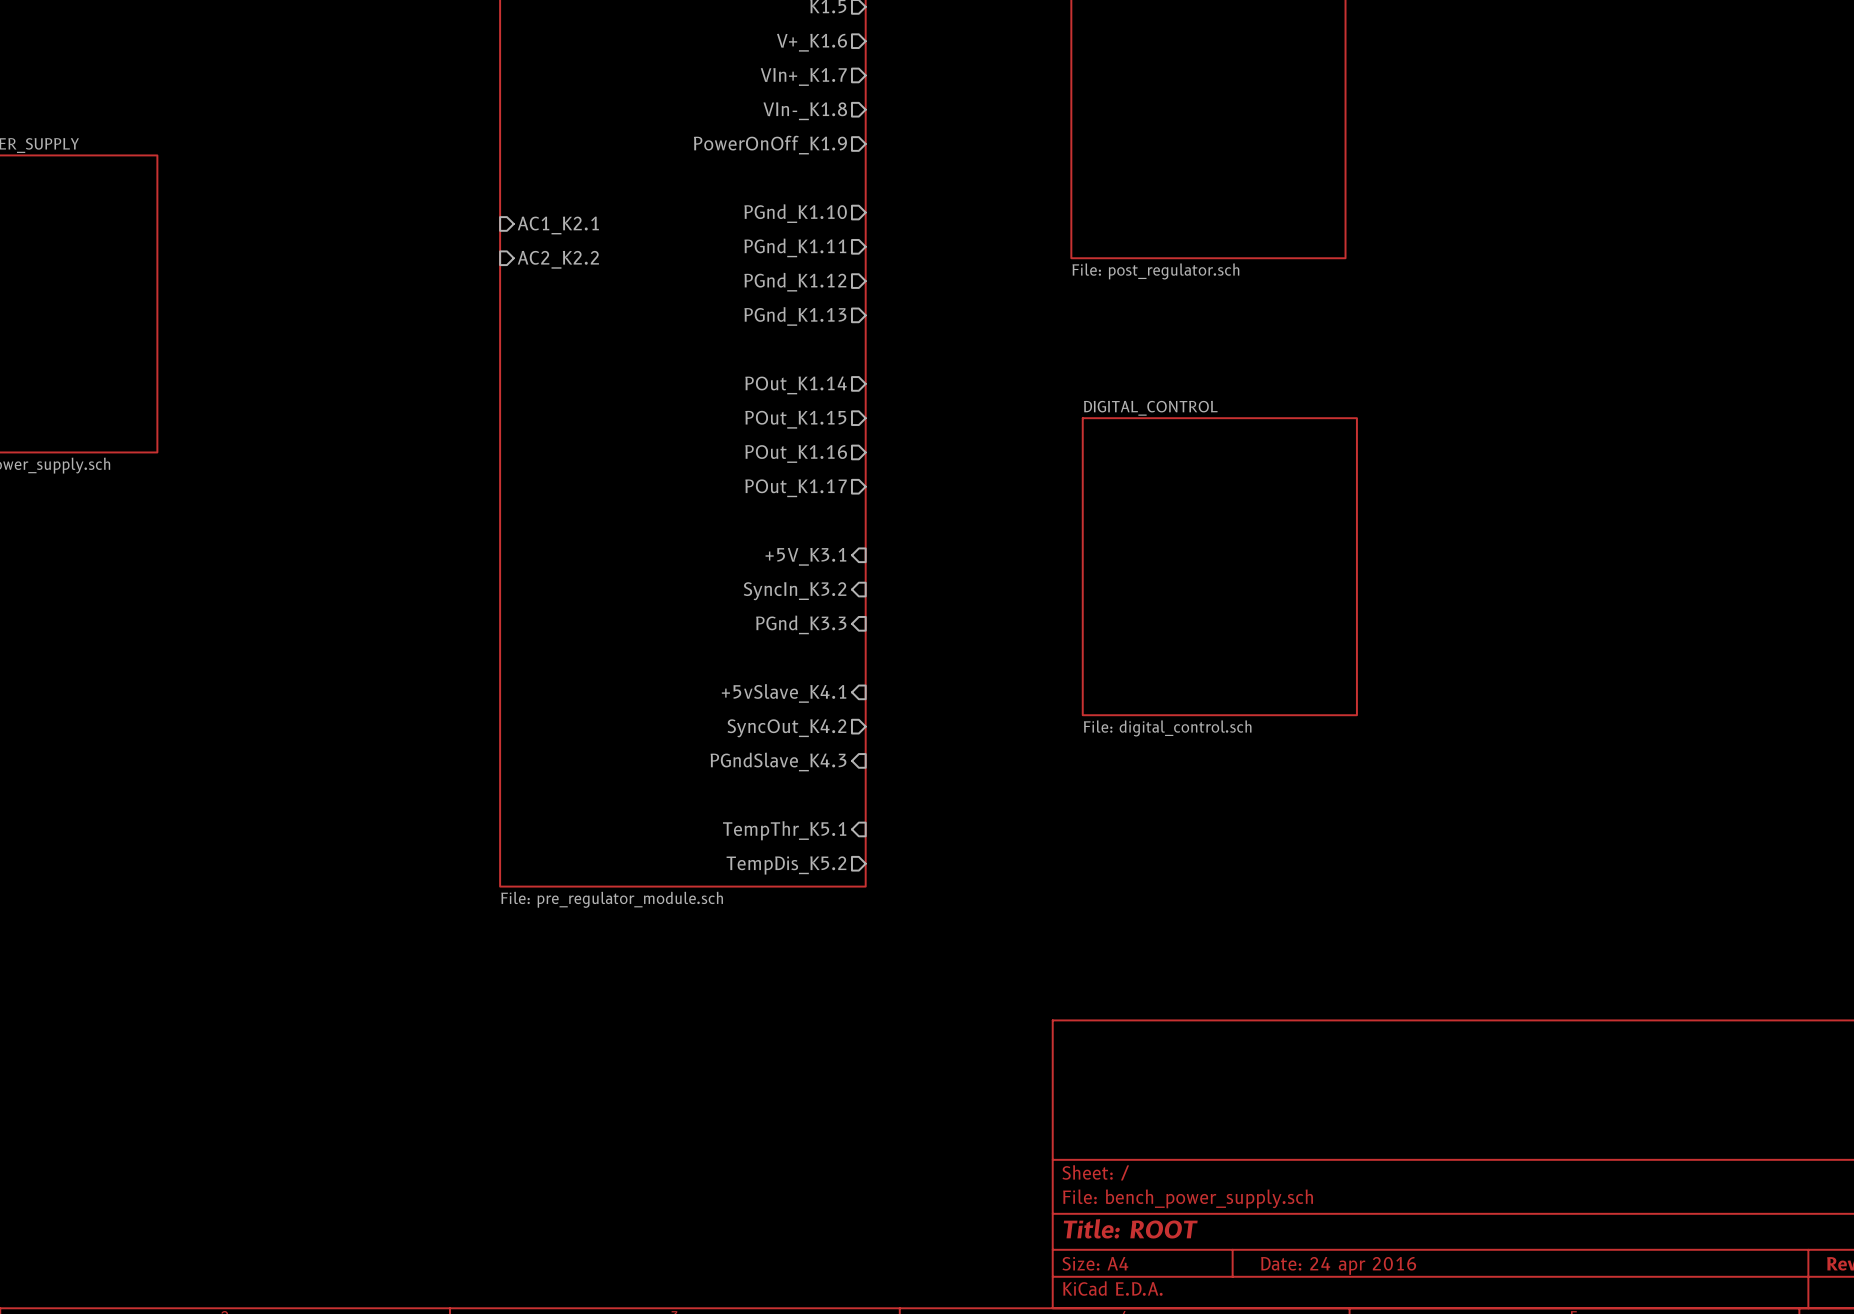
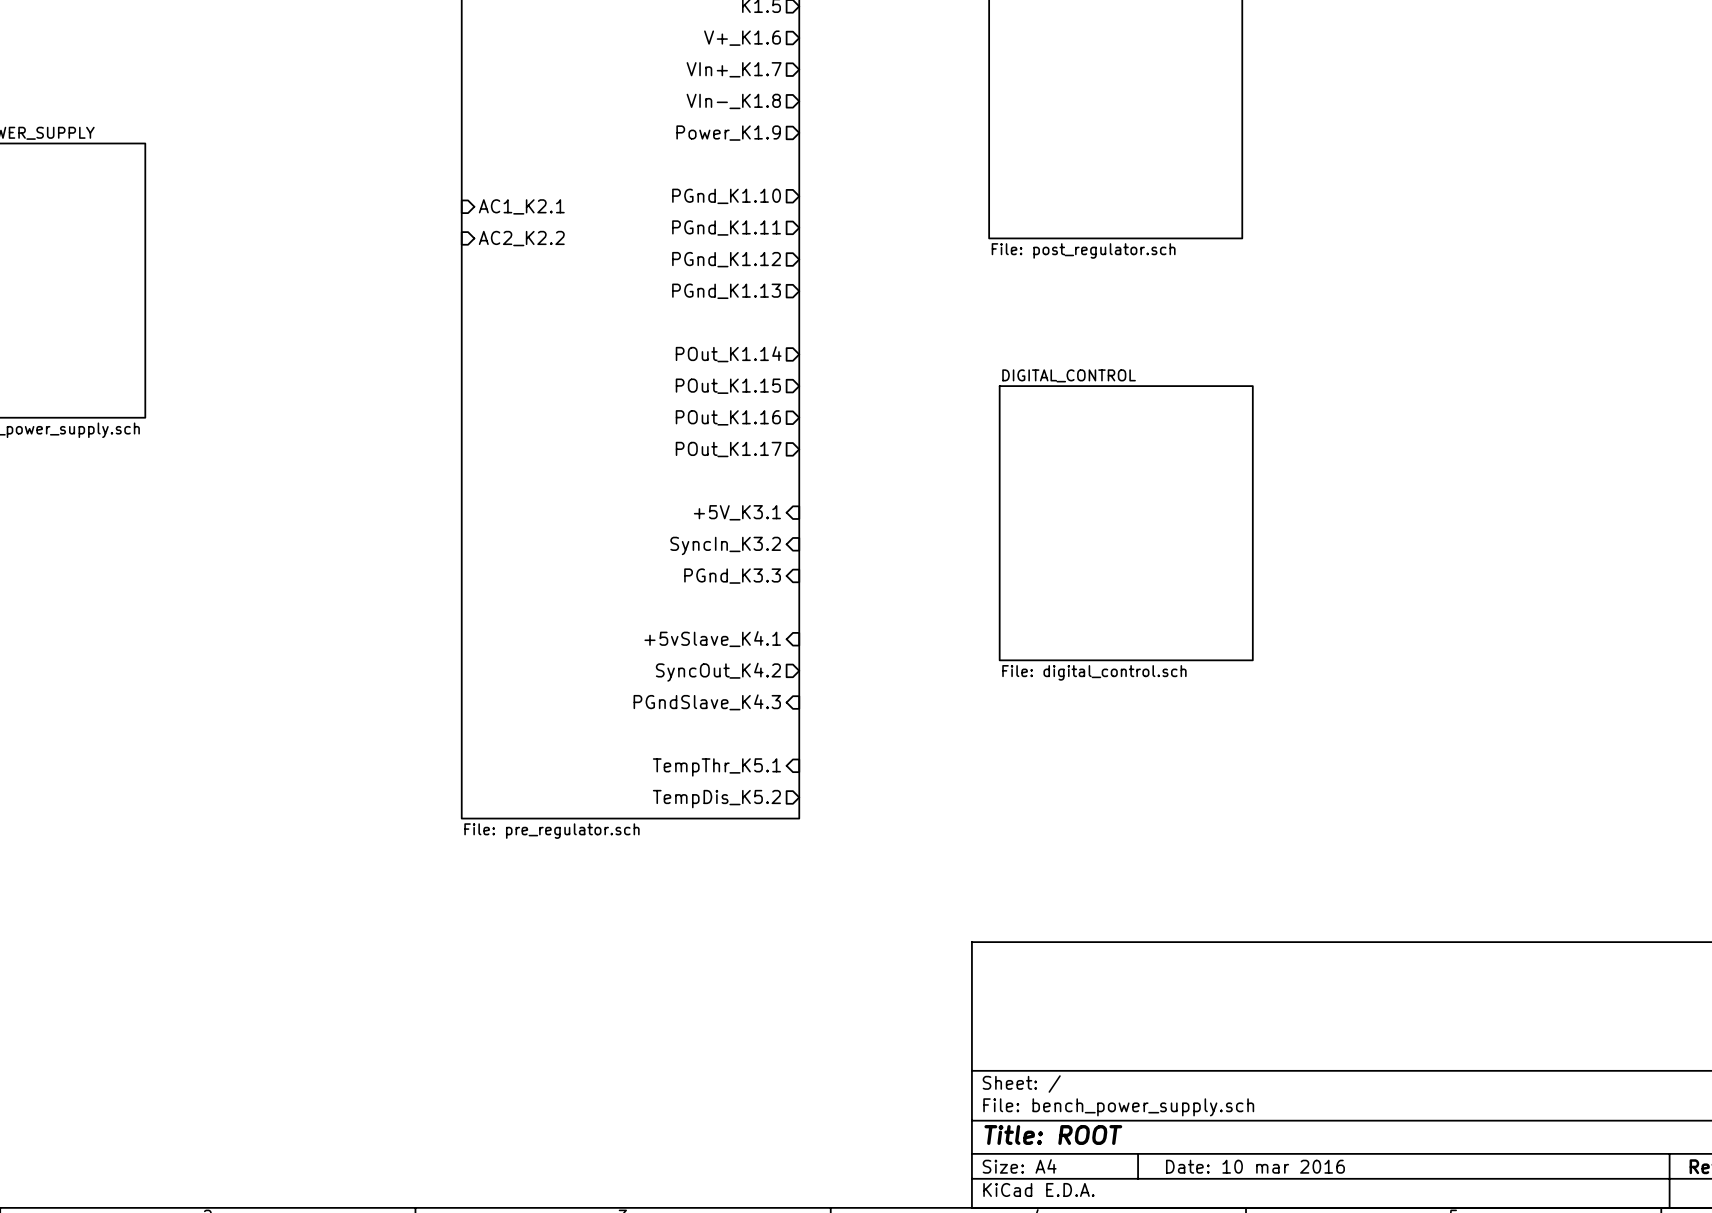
sheet pin: PowerOnOff_K1.9 (770, 145) -> Power_K1.9 (728, 133)
sheet value: File: pre_regulator_module.sch (612, 899) -> File: pre_regulator.sch (551, 831)
title block: Date: 24 apr 2016 (1338, 1265) -> Date: 10 mar 2016 (1255, 1166)

